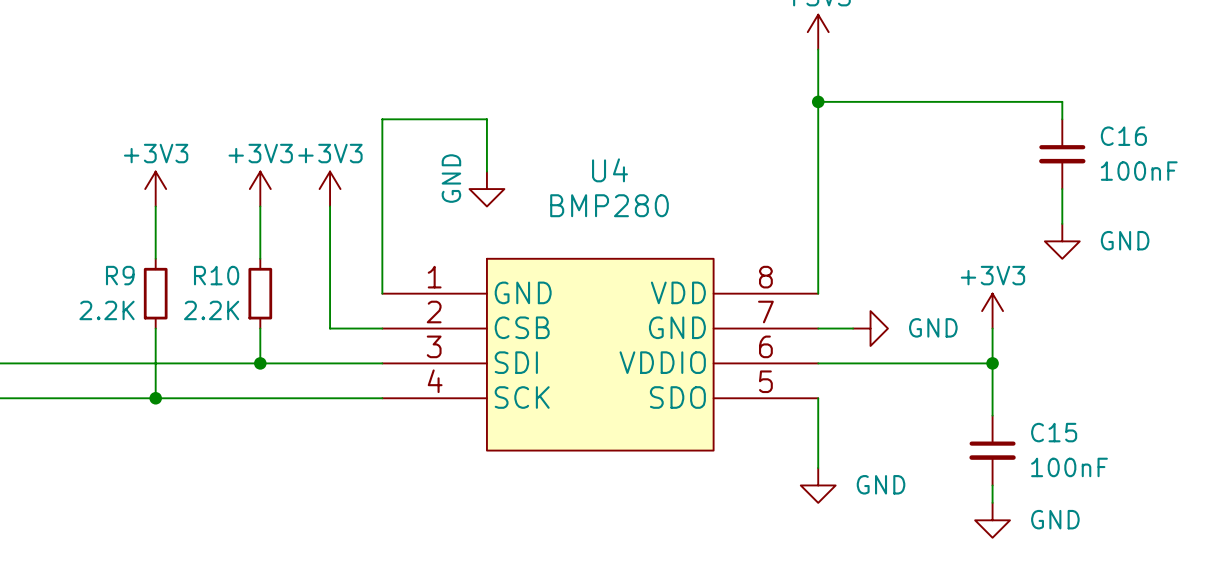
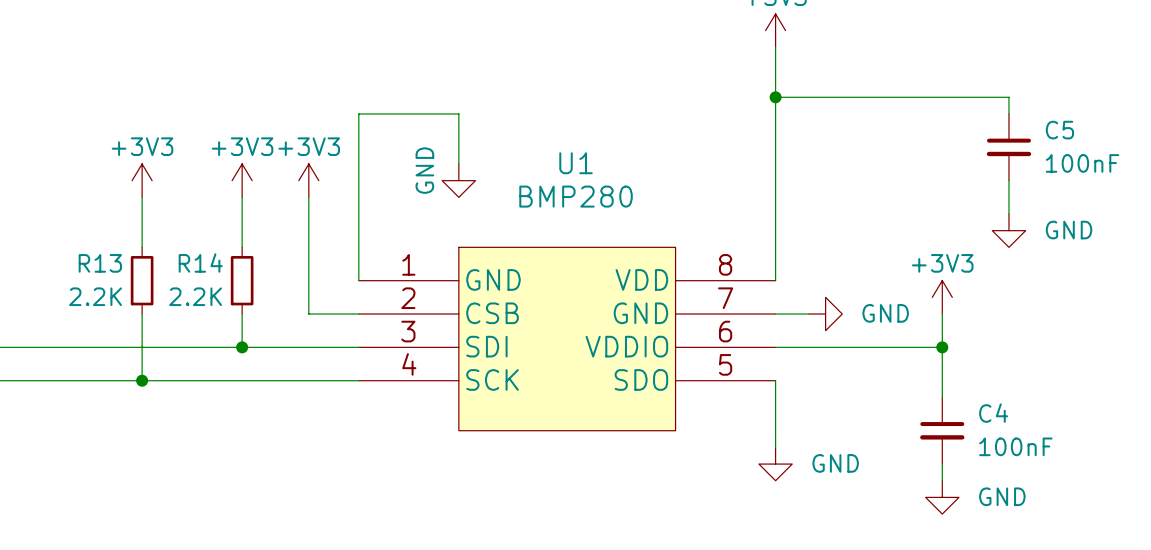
C16 name: C16 (1123, 136) -> C5 (1059, 130)
U4 name: U4 (610, 170) -> U1 (576, 163)
R9 name: R9 (120, 275) -> R13 (100, 263)
R10 name: R10 (216, 275) -> R14 (200, 262)
C15 name: C15 (1054, 432) -> C4 (993, 413)

